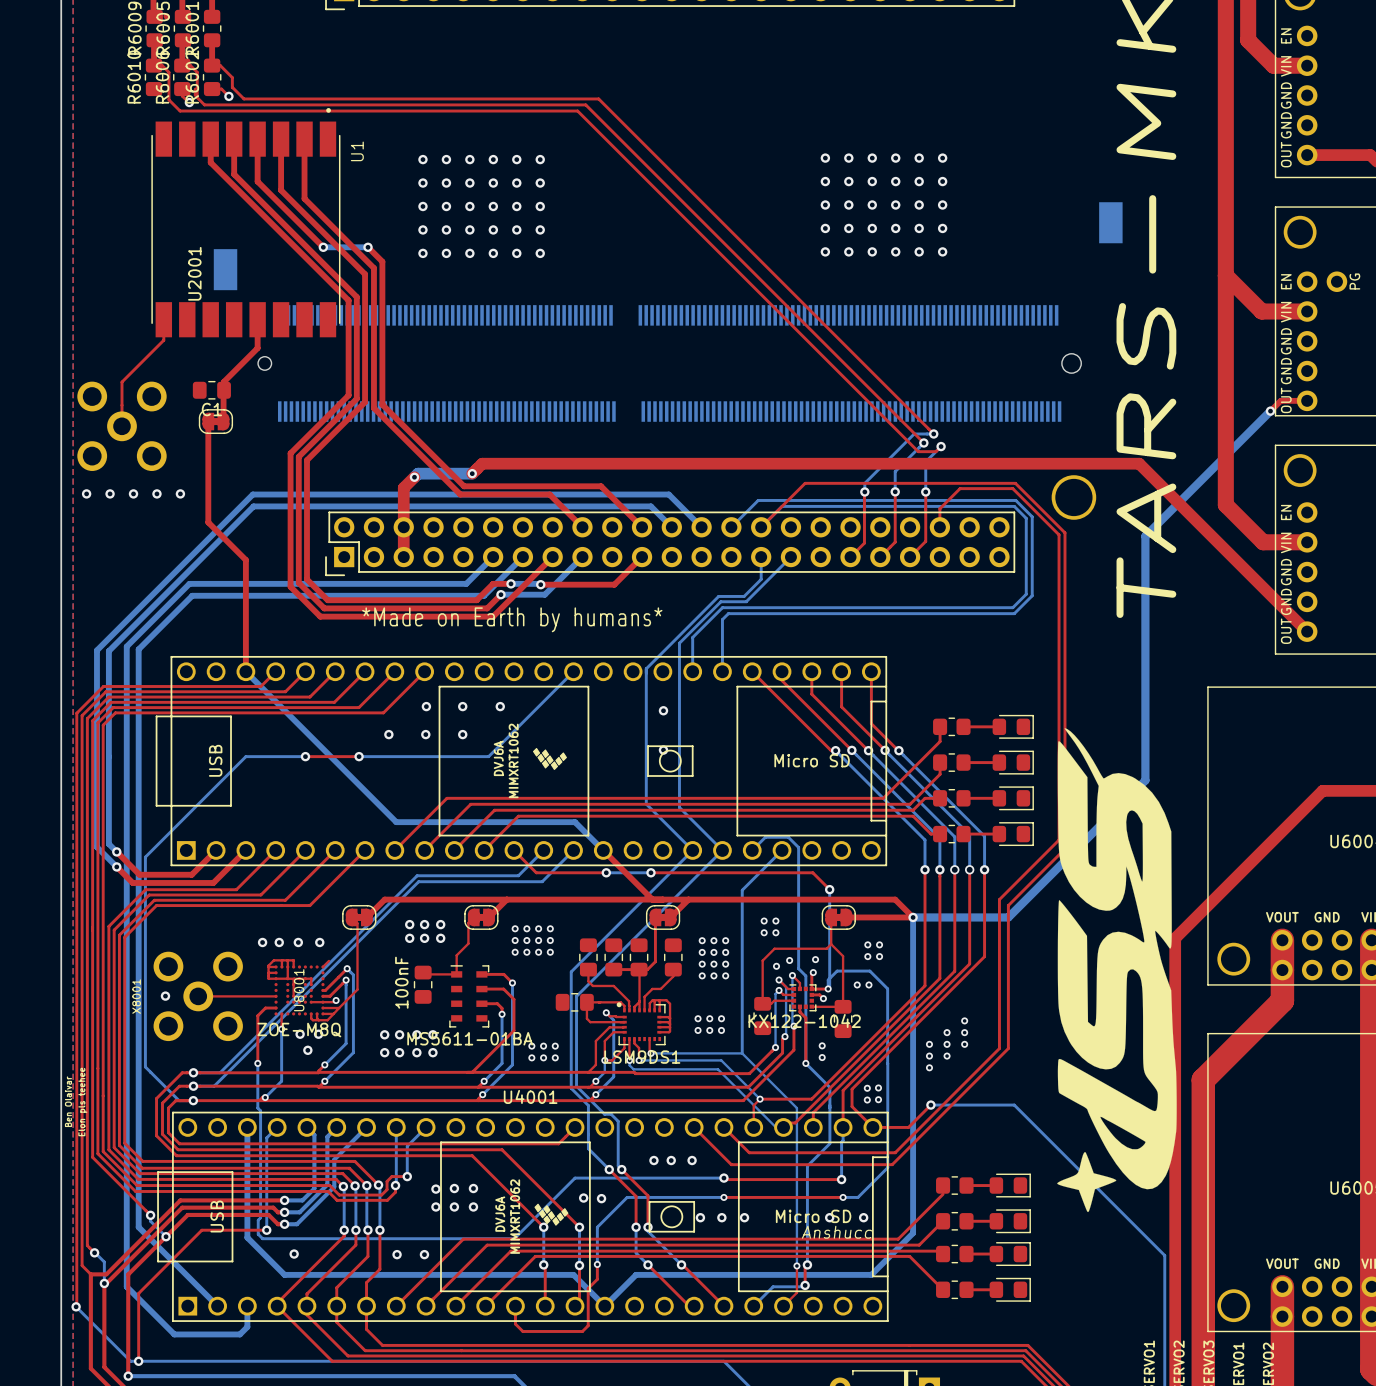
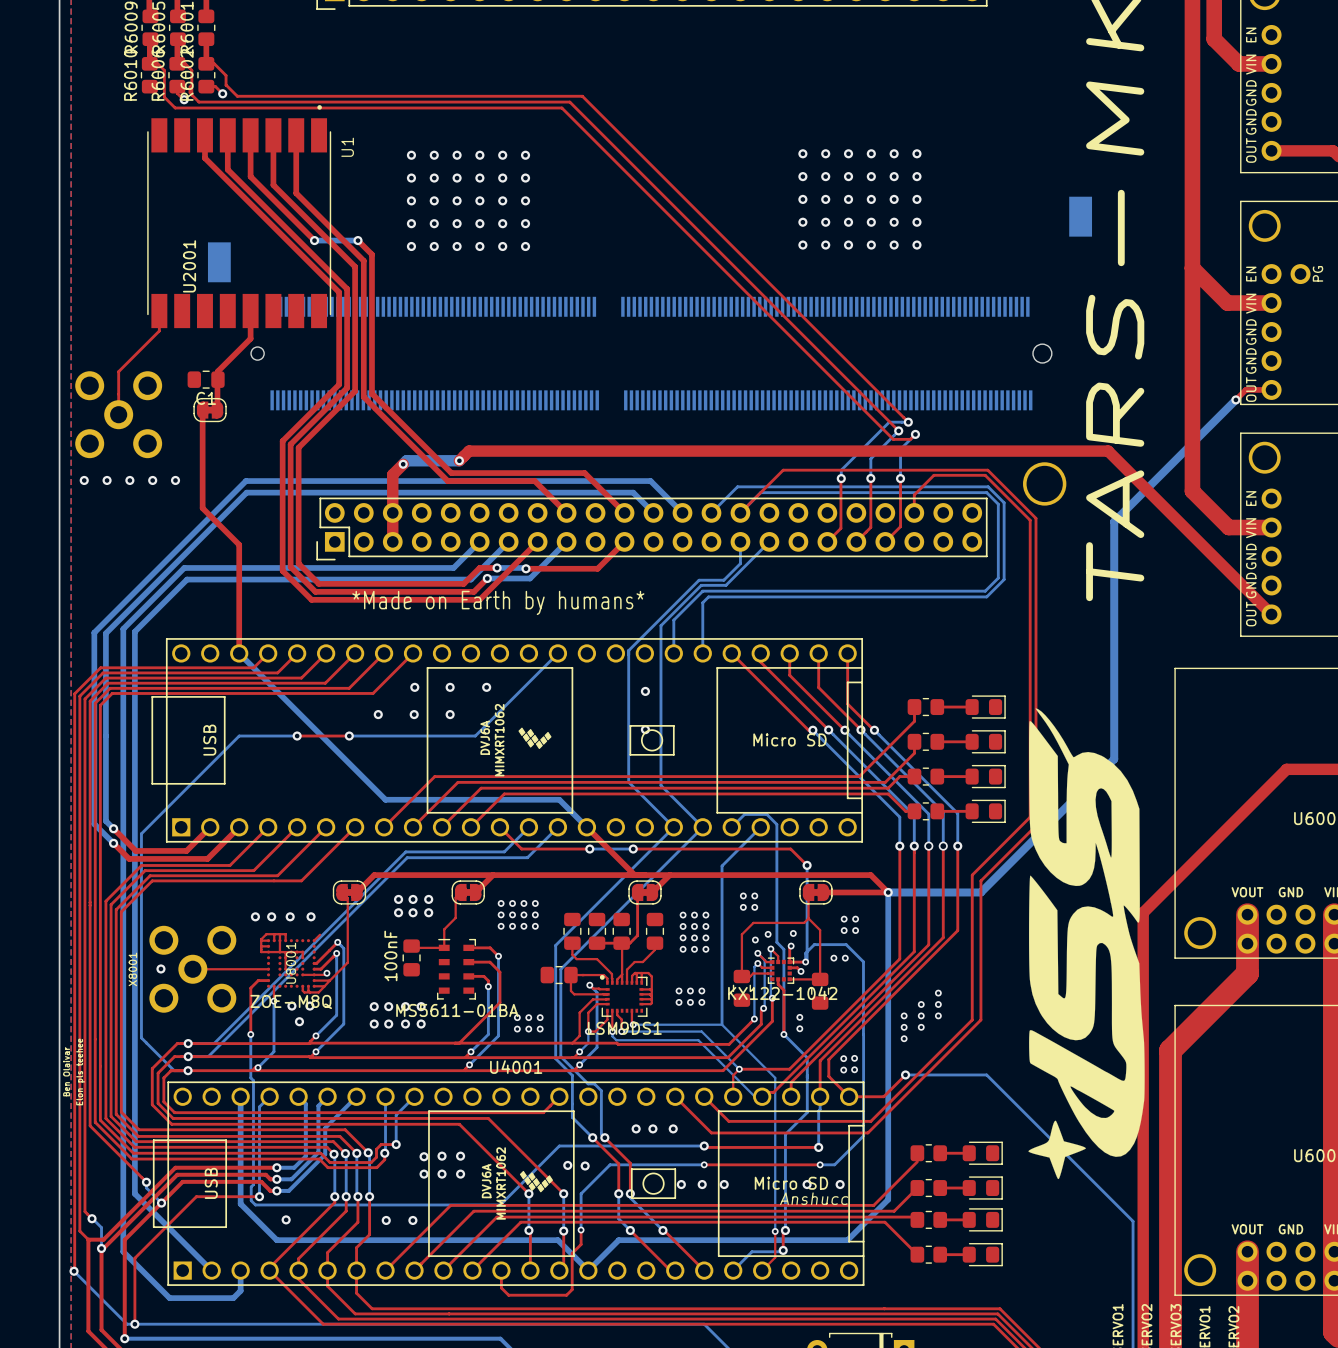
top track: (166, 16) (166, 16) -> none

